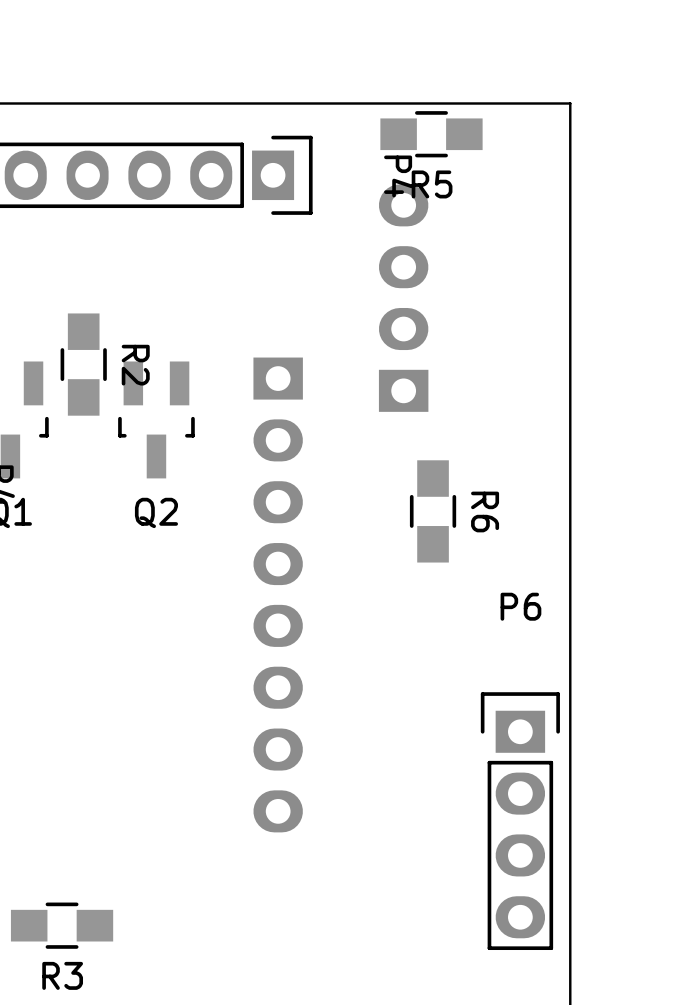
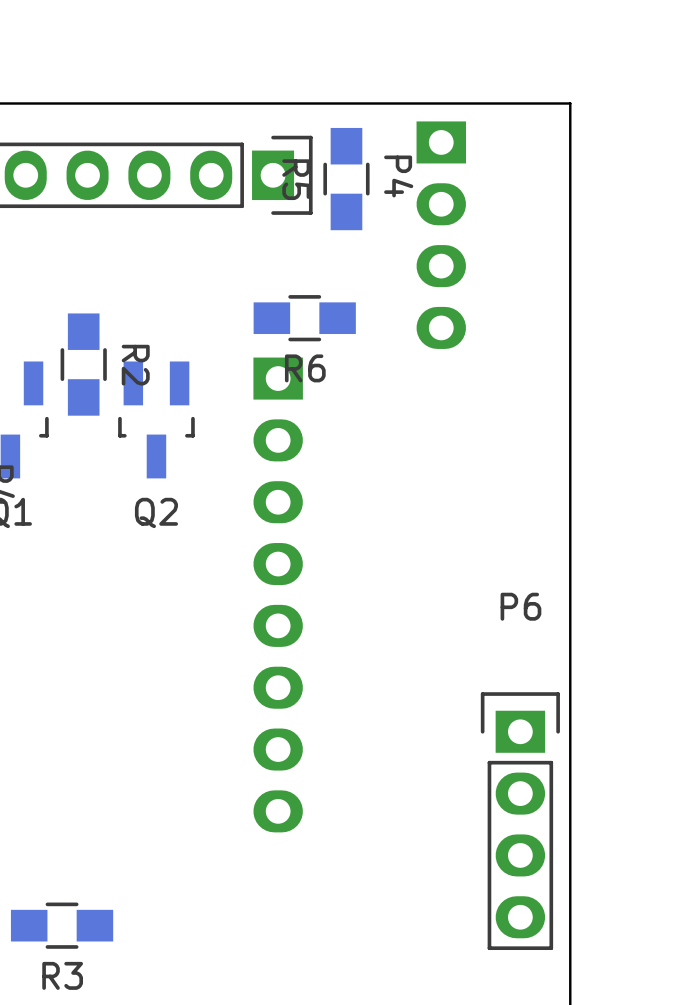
R5 rotation: 0° (431, 134) -> 90° clockwise (346, 179)
R5 position: (431, 134) -> (346, 179)
part rotation: 0° (403, 298) -> 180° (441, 235)
R6 rotation: 0° (433, 511) -> 90° clockwise (304, 318)
R6 position: (433, 511) -> (304, 318)

